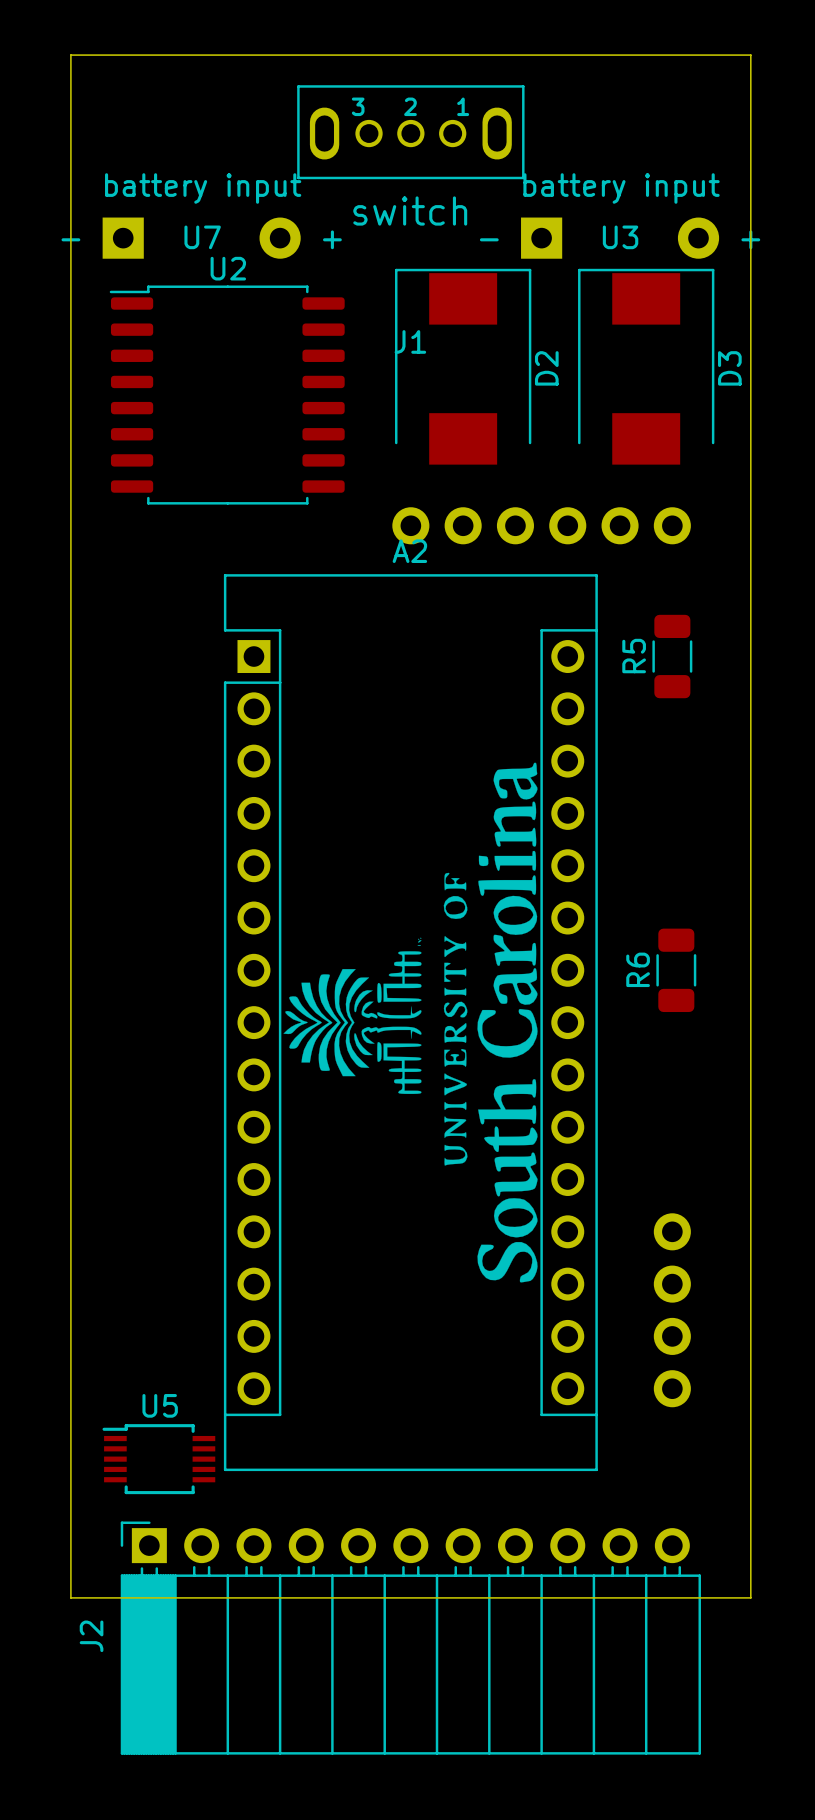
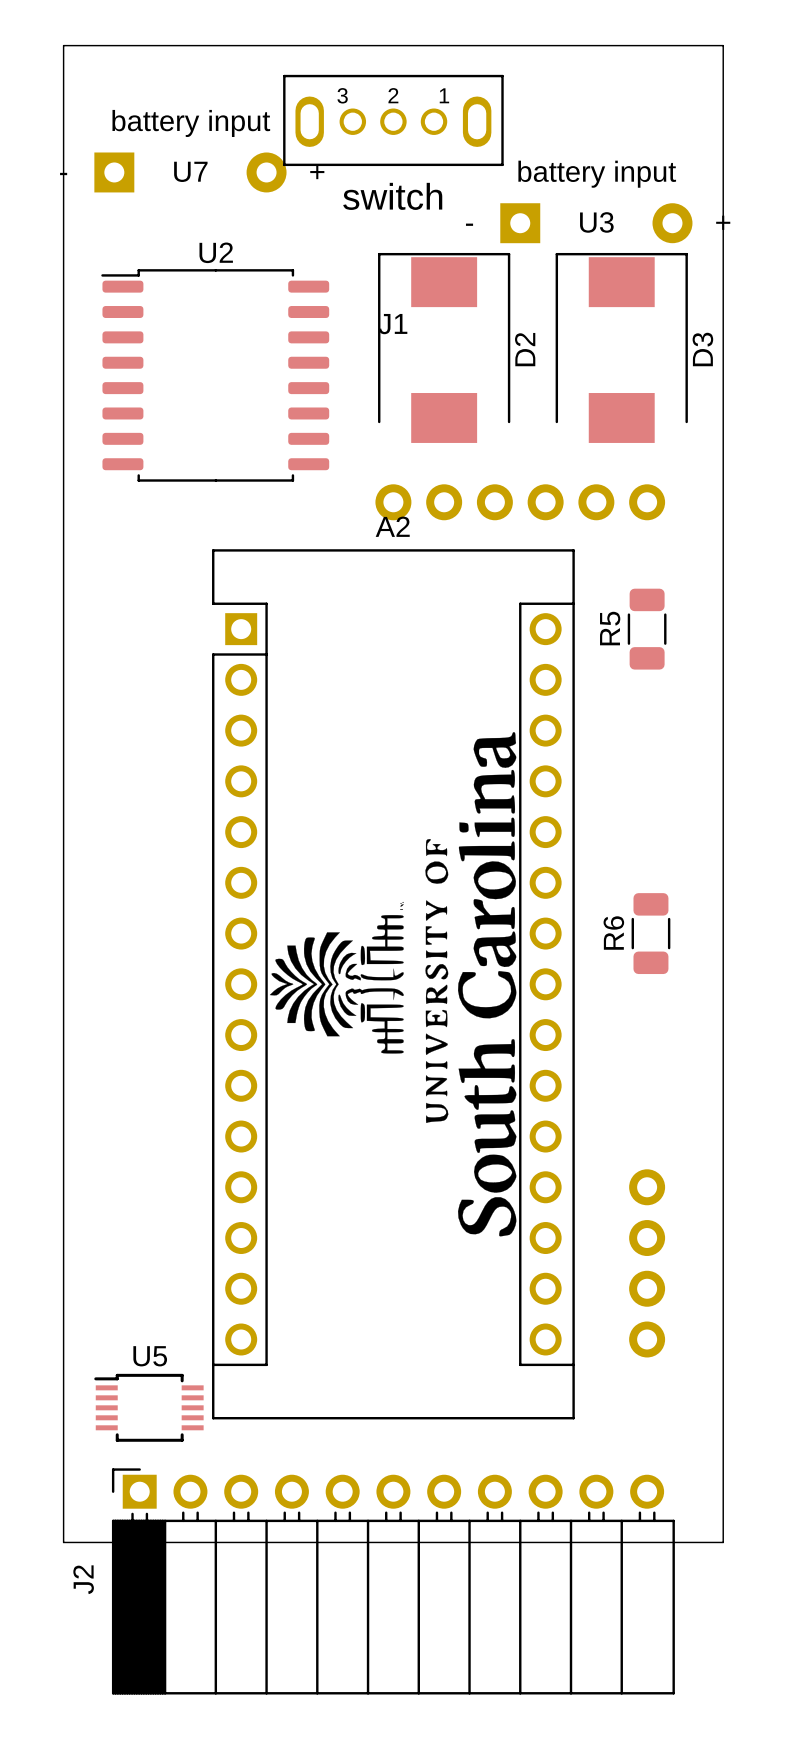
U7 position: (201, 238) -> (190, 172)

